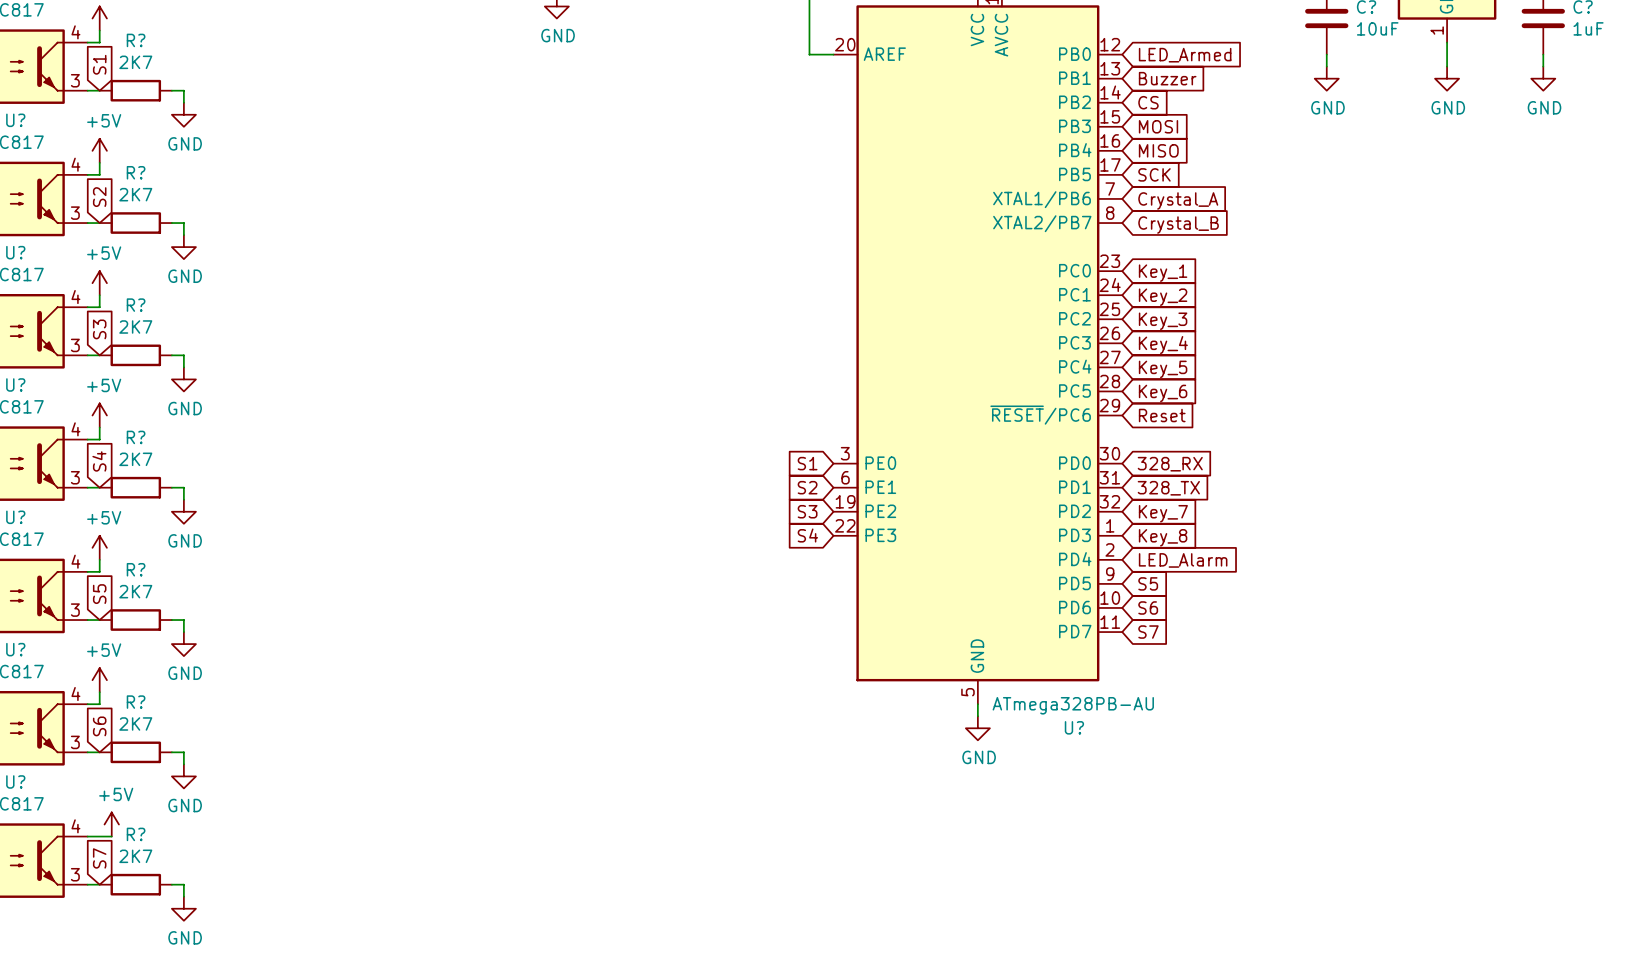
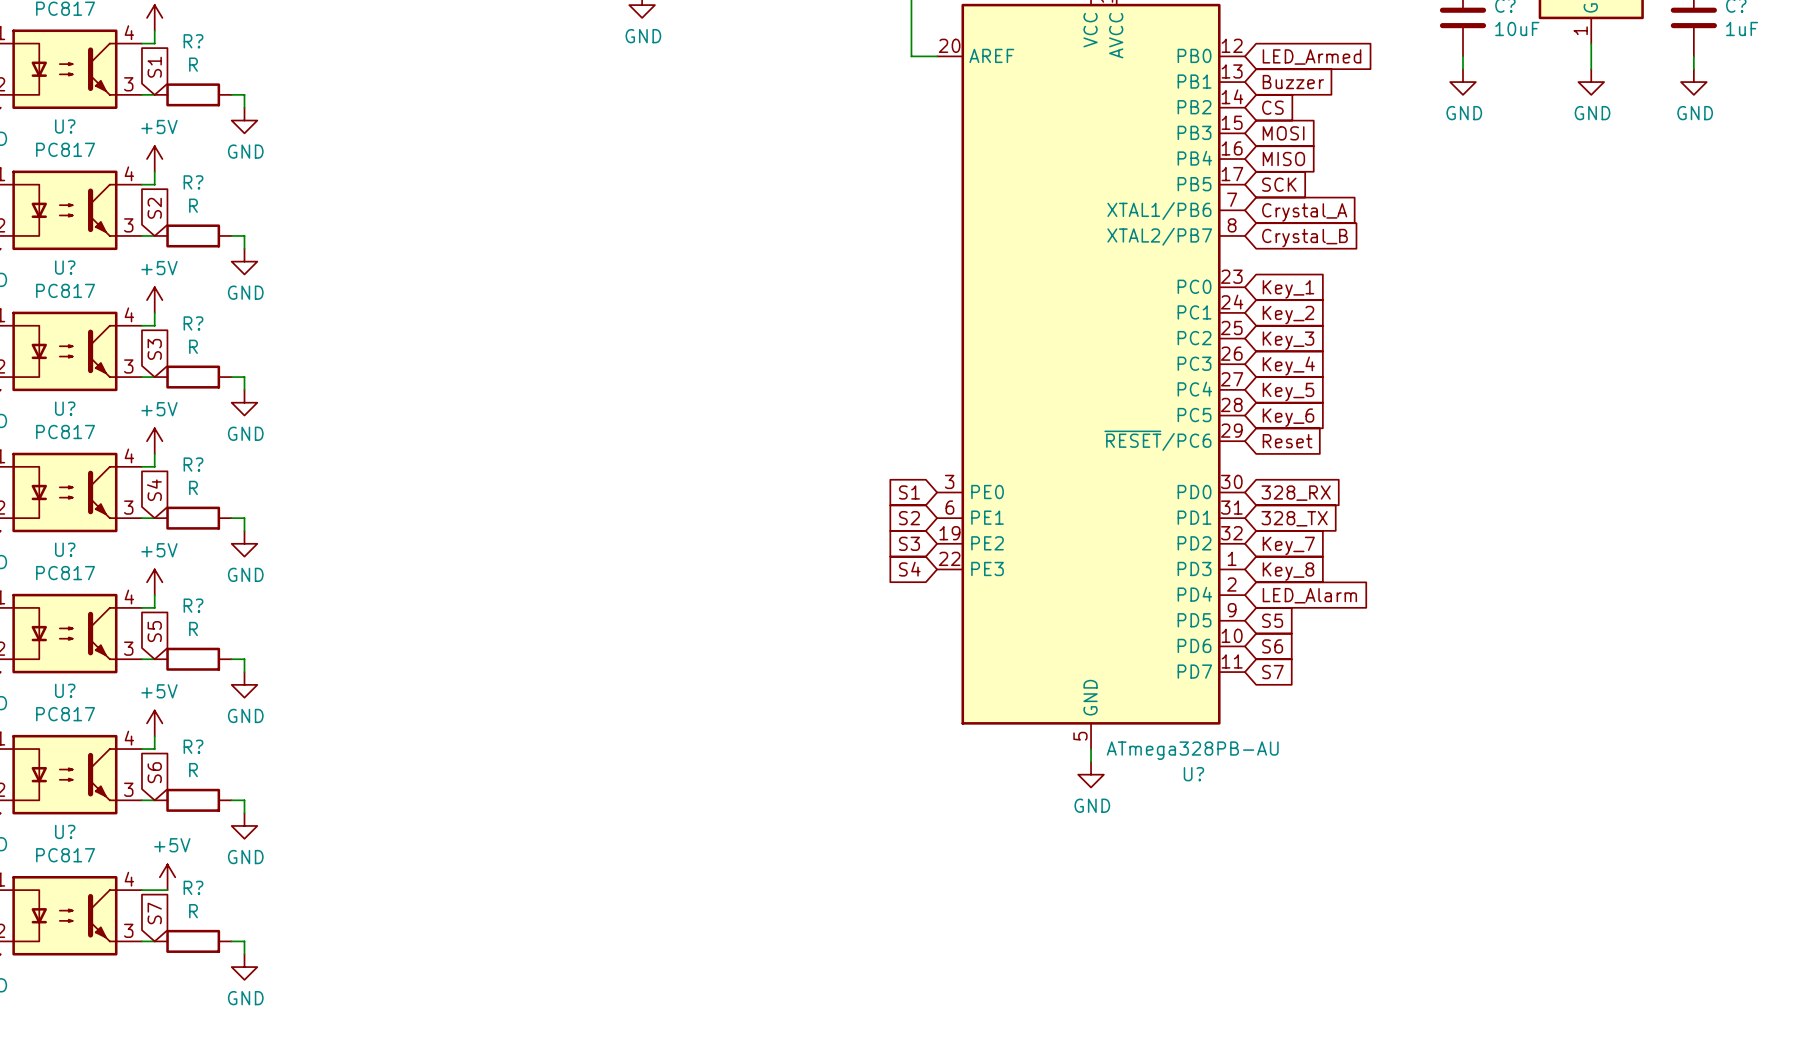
R? value: 2K7 (135, 62) -> R (193, 64)
R? value: 2K7 (135, 194) -> R (193, 205)
R? value: 2K7 (135, 326) -> R (193, 346)
R? value: 2K7 (135, 459) -> R (193, 487)
R? value: 2K7 (135, 591) -> R (193, 629)
R? value: 2K7 (135, 723) -> R (193, 770)
R? value: 2K7 (135, 856) -> R (193, 911)

